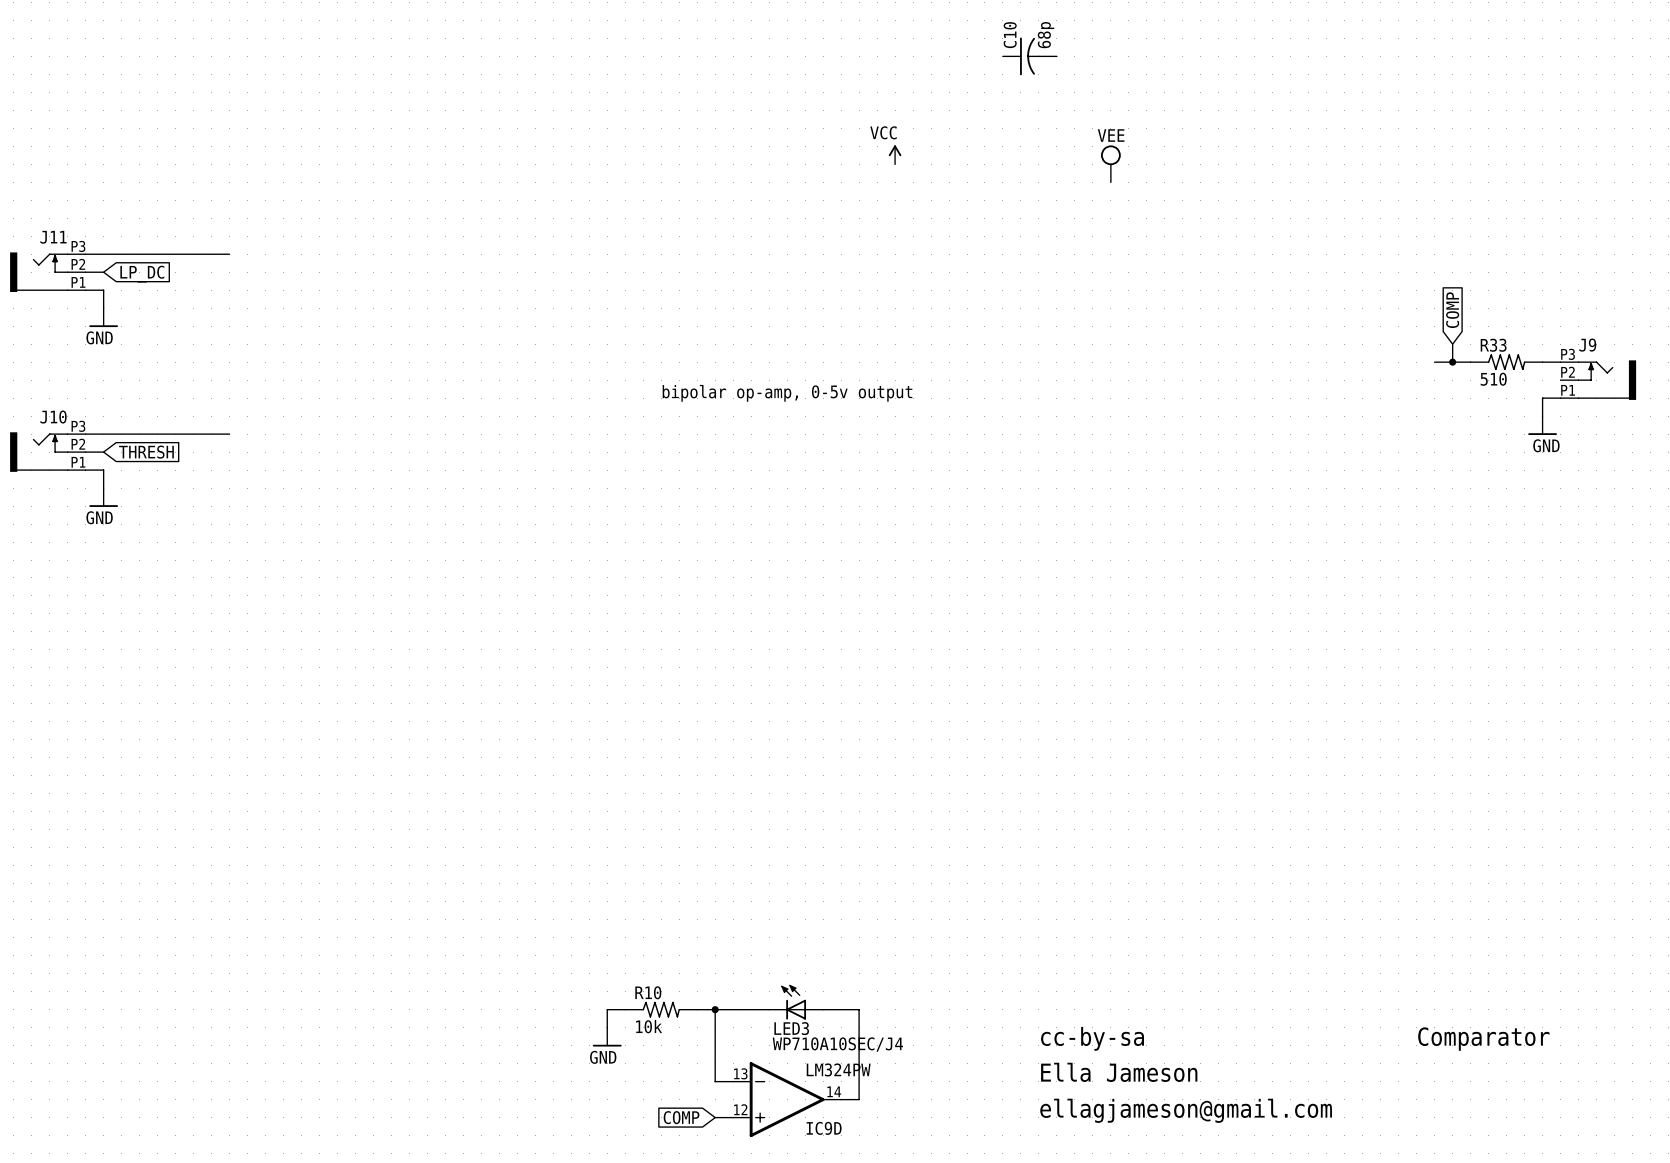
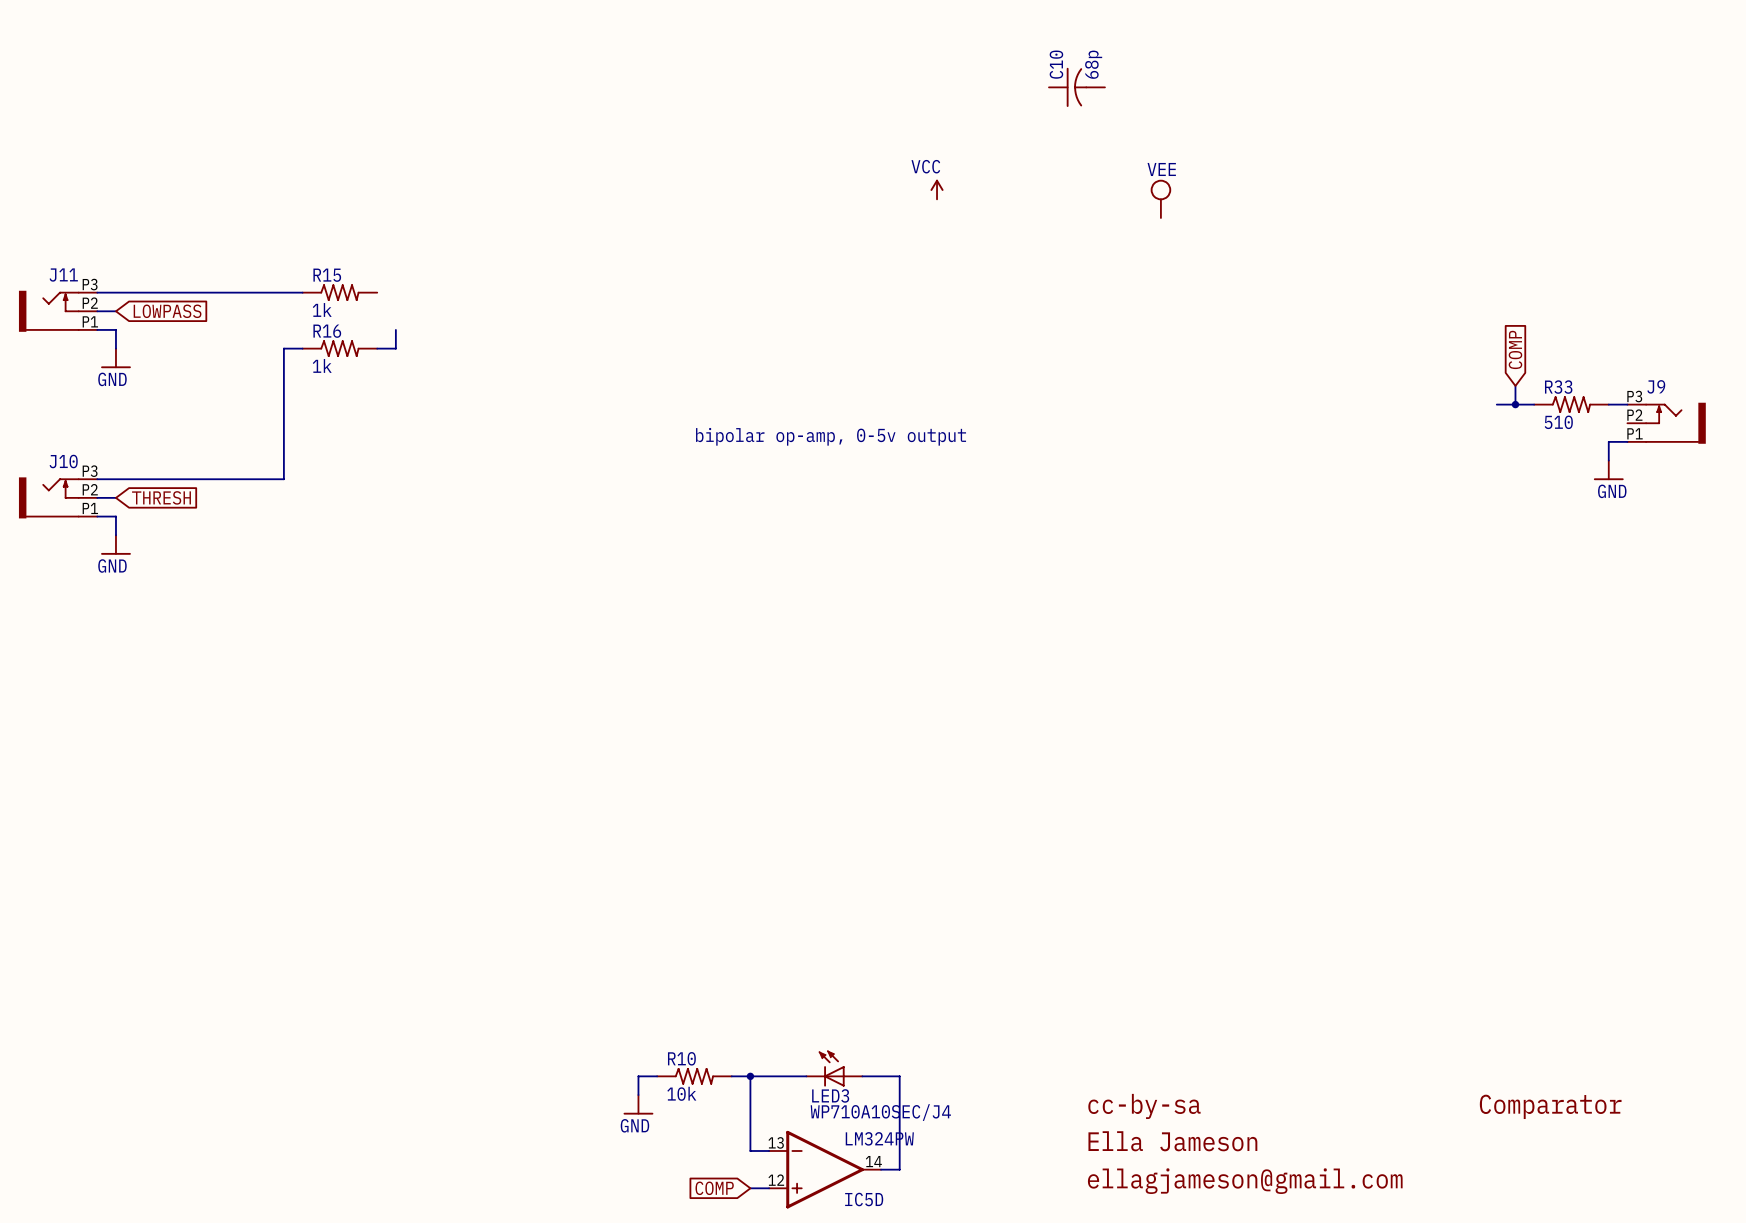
wire: none -> (246, 292) (302, 292)
R15: none -> 1k (339, 292)
global label: LP_DC (142, 274) -> LOWPASS (167, 311)
wire: none -> (395, 329) (395, 348) (377, 348)
wire: none -> (302, 348) (283, 348) (283, 479) (246, 479)
R16: none -> 1k (339, 348)
IC9D name: IC9D (824, 1128) -> IC5D (864, 1199)

